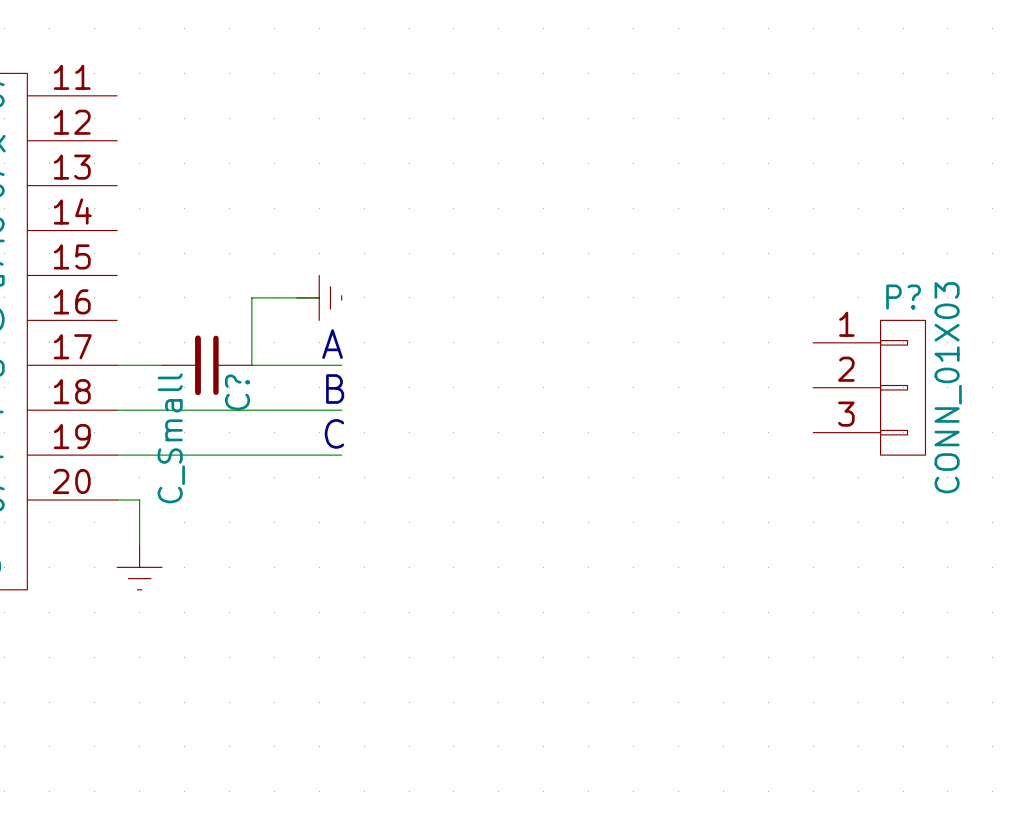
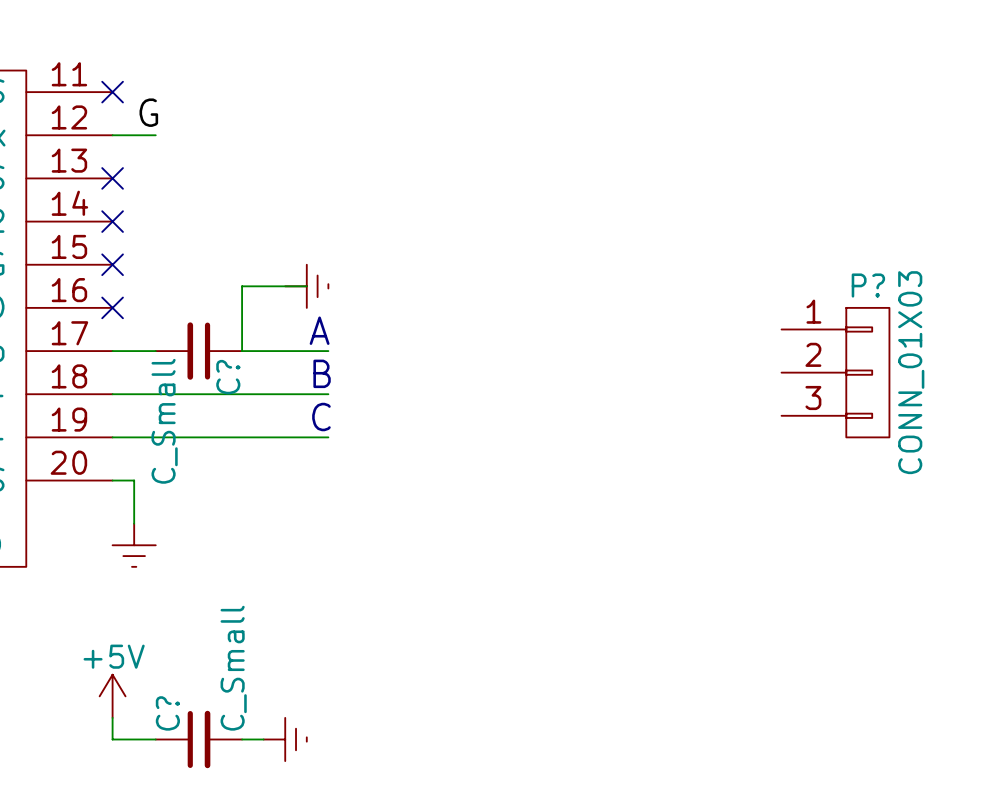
no-connect mark: none -> (112, 92)
label: none -> G (148, 112)
wire: none -> (112, 135) (155, 135)
no-connect mark: none -> (112, 178)
no-connect mark: none -> (112, 221)
no-connect mark: none -> (112, 264)
no-connect mark: none -> (112, 307)
power symbol: none -> +5V (112, 696)
wire: none -> (112, 717) (112, 739) (155, 739)
C?: none -> C_Small (198, 739)
wire: none -> (242, 739) (263, 739)
power symbol: none -> (285, 739)

